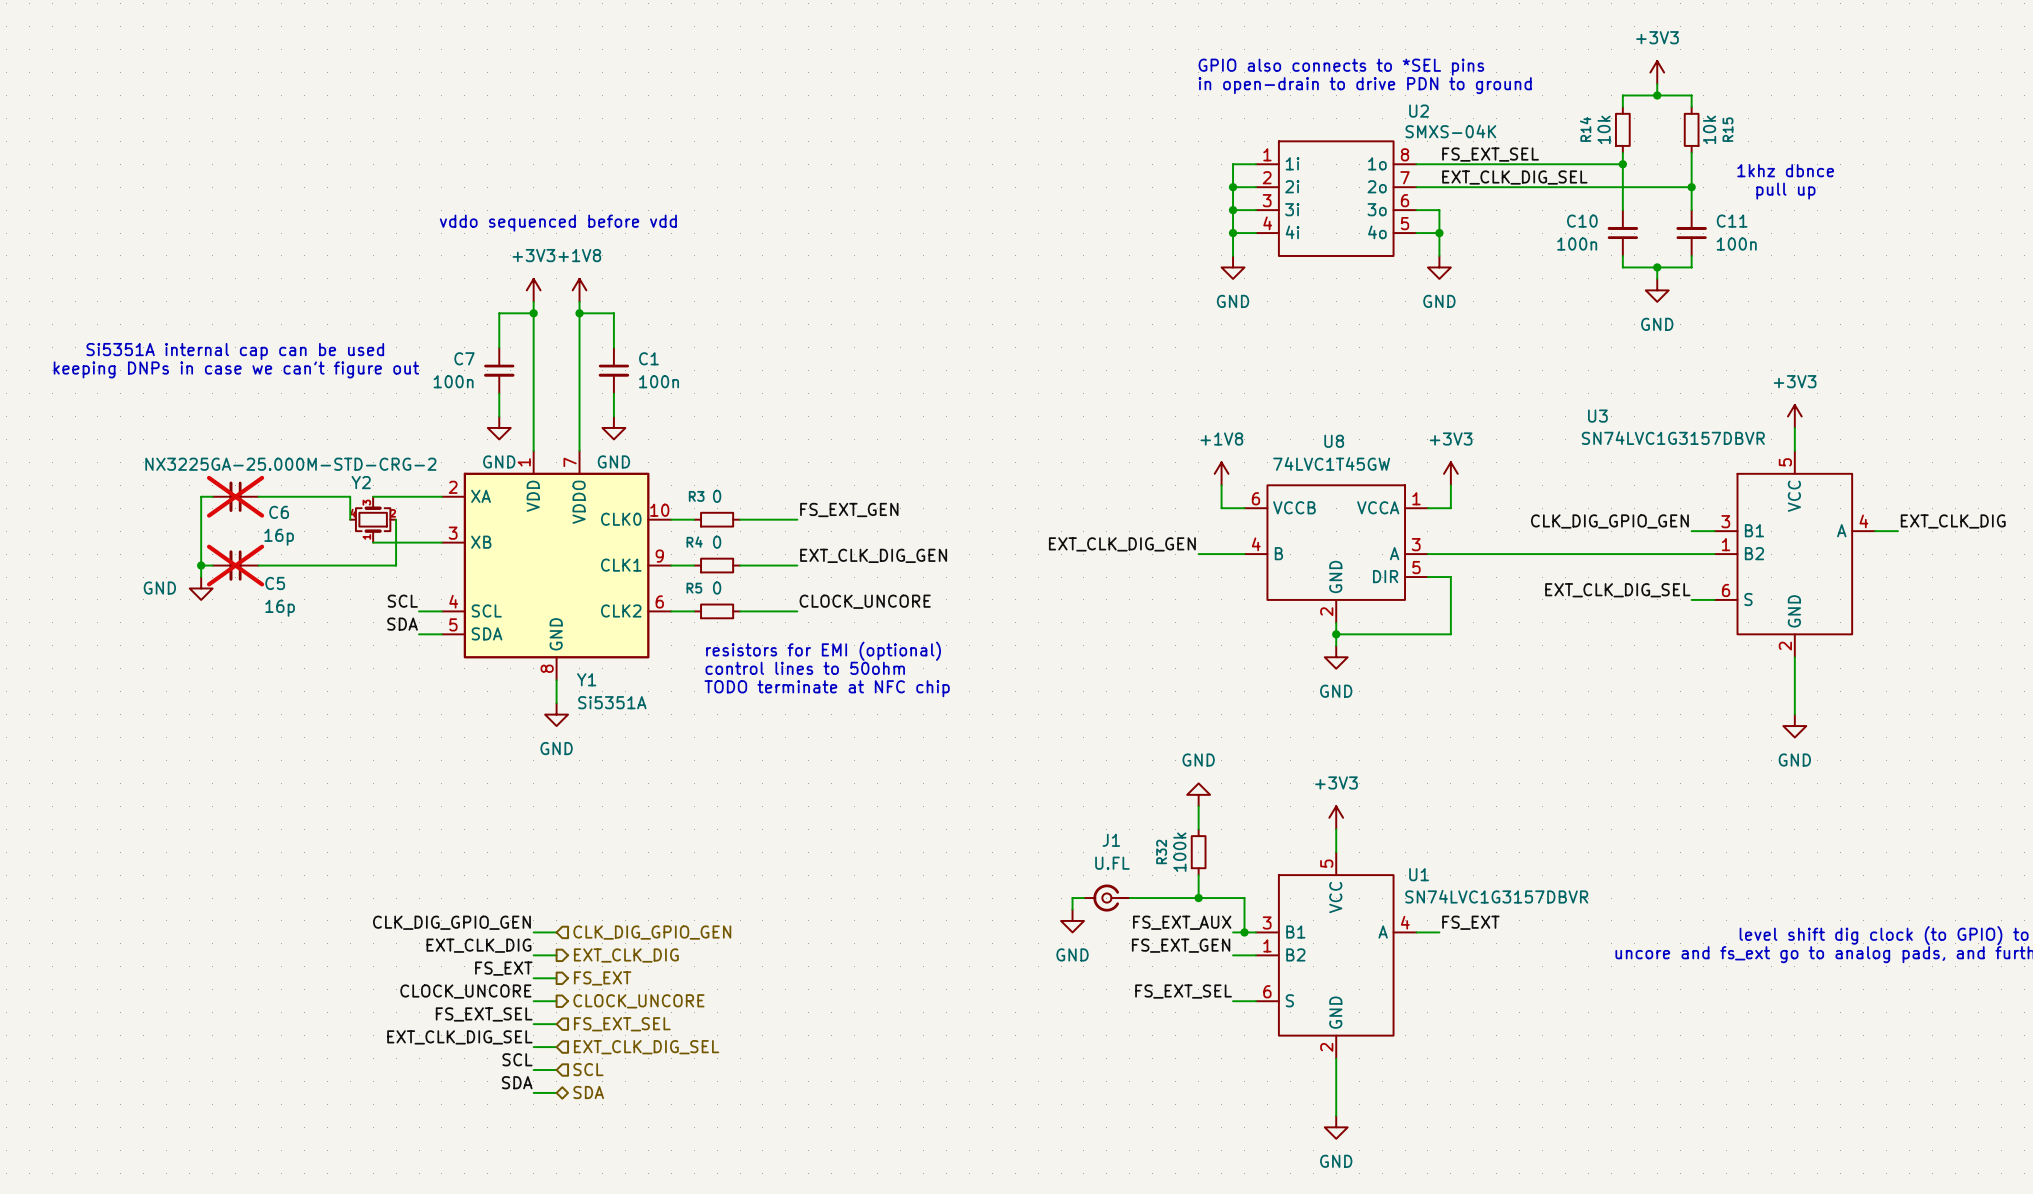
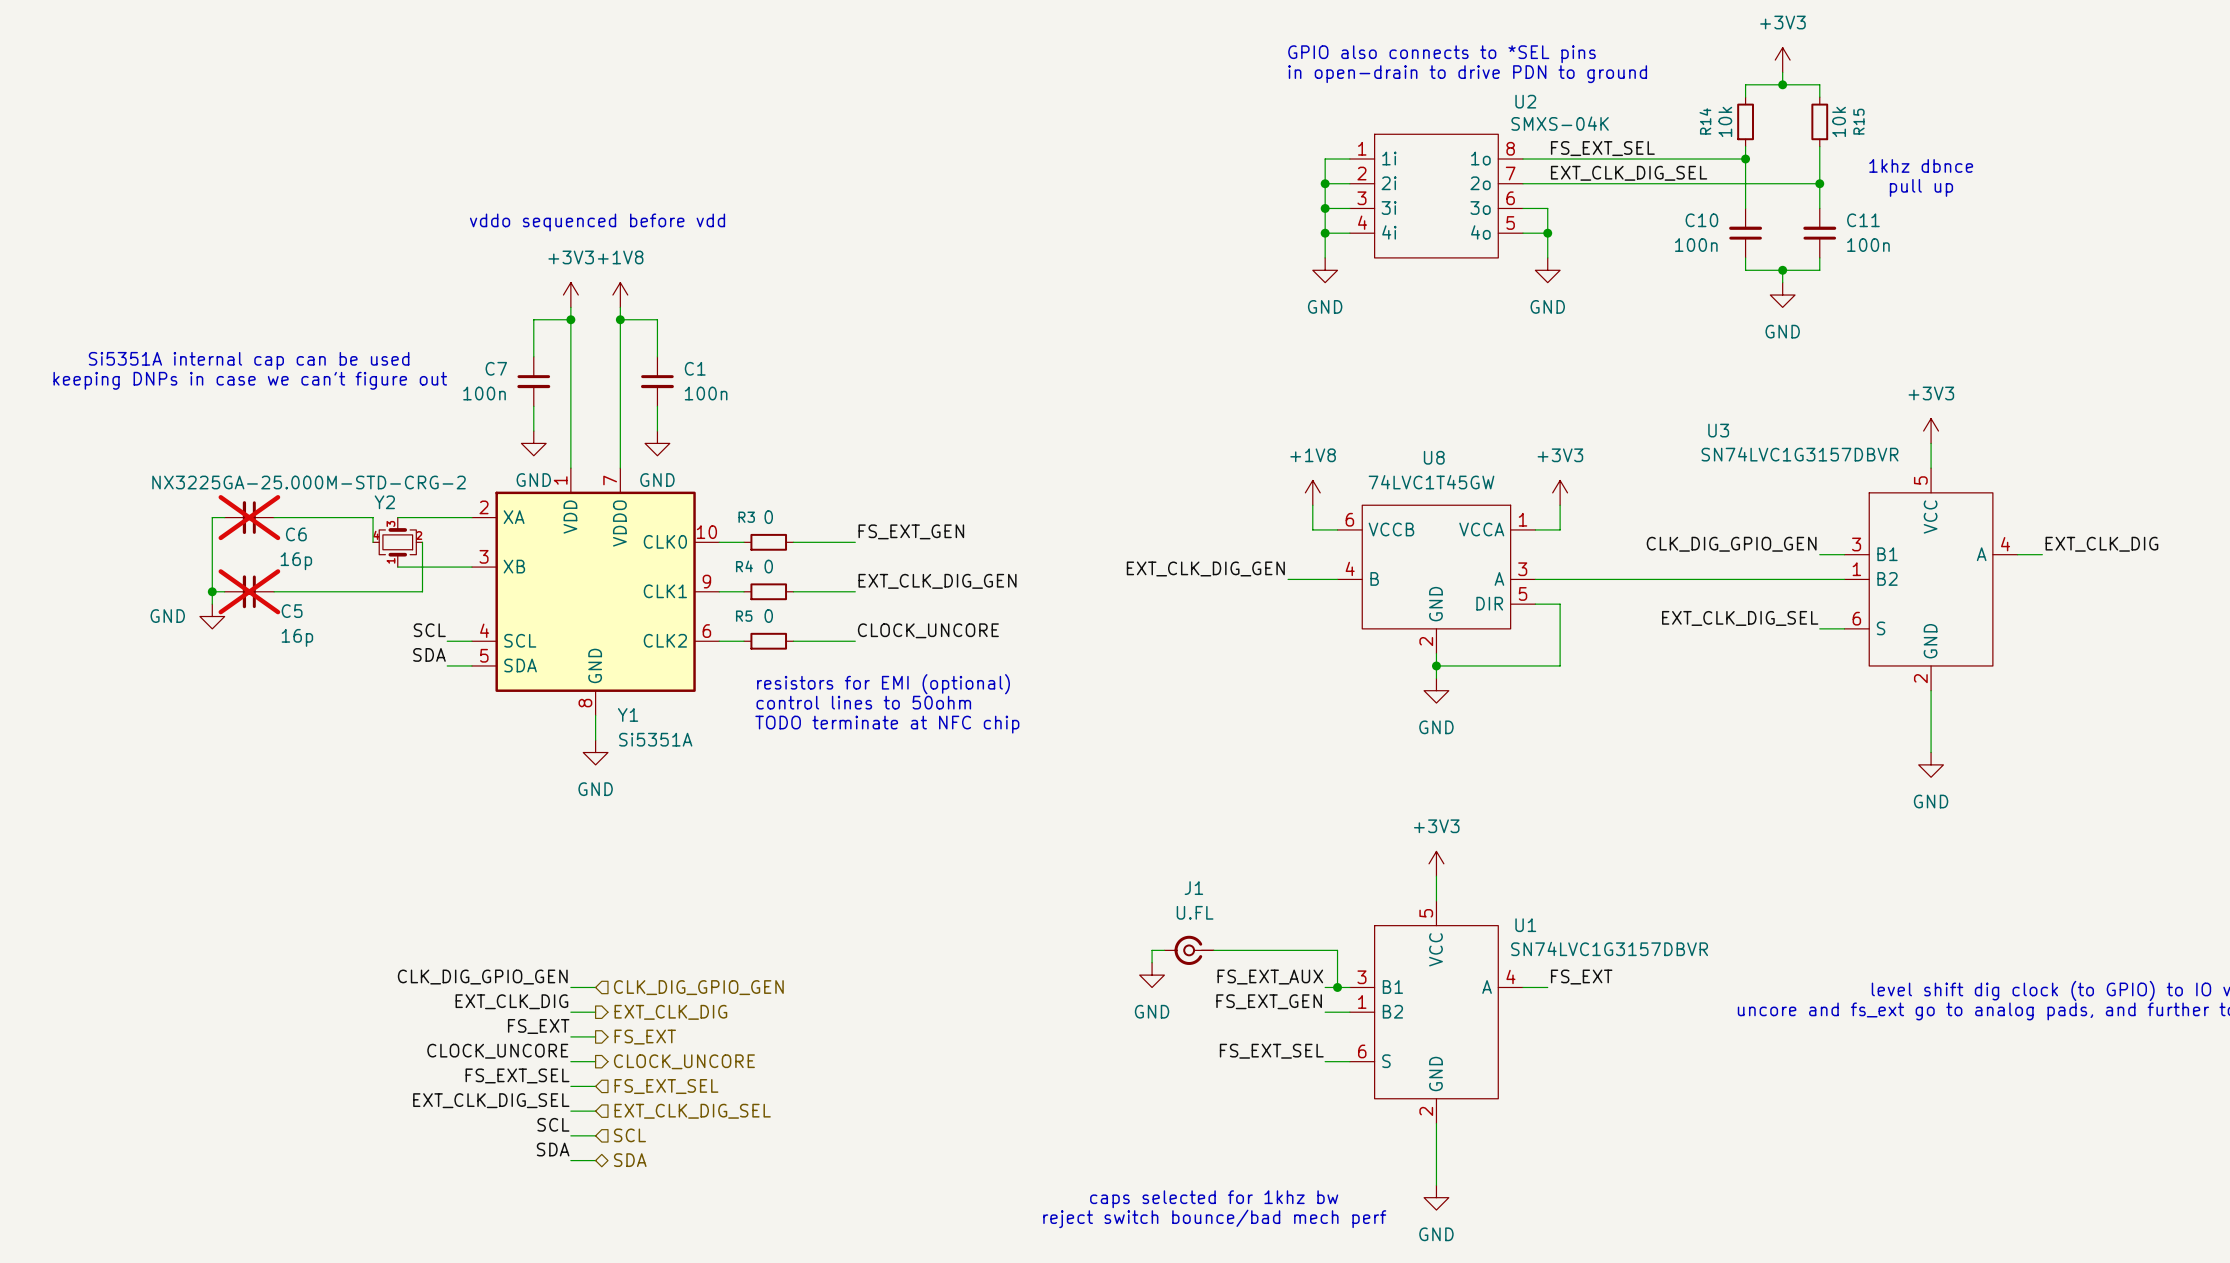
power symbol: GND (1198, 794) -> none
wire: (1198, 806) (1198, 829) -> none
R32: 100k (1198, 852) -> none
wire: (1198, 875) (1198, 898) -> none
junction: (1198, 898) -> none
text: none -> caps selected for 1khz bw (1214, 1199)
text: none -> reject switch bounce/bad mech perf (1214, 1218)

